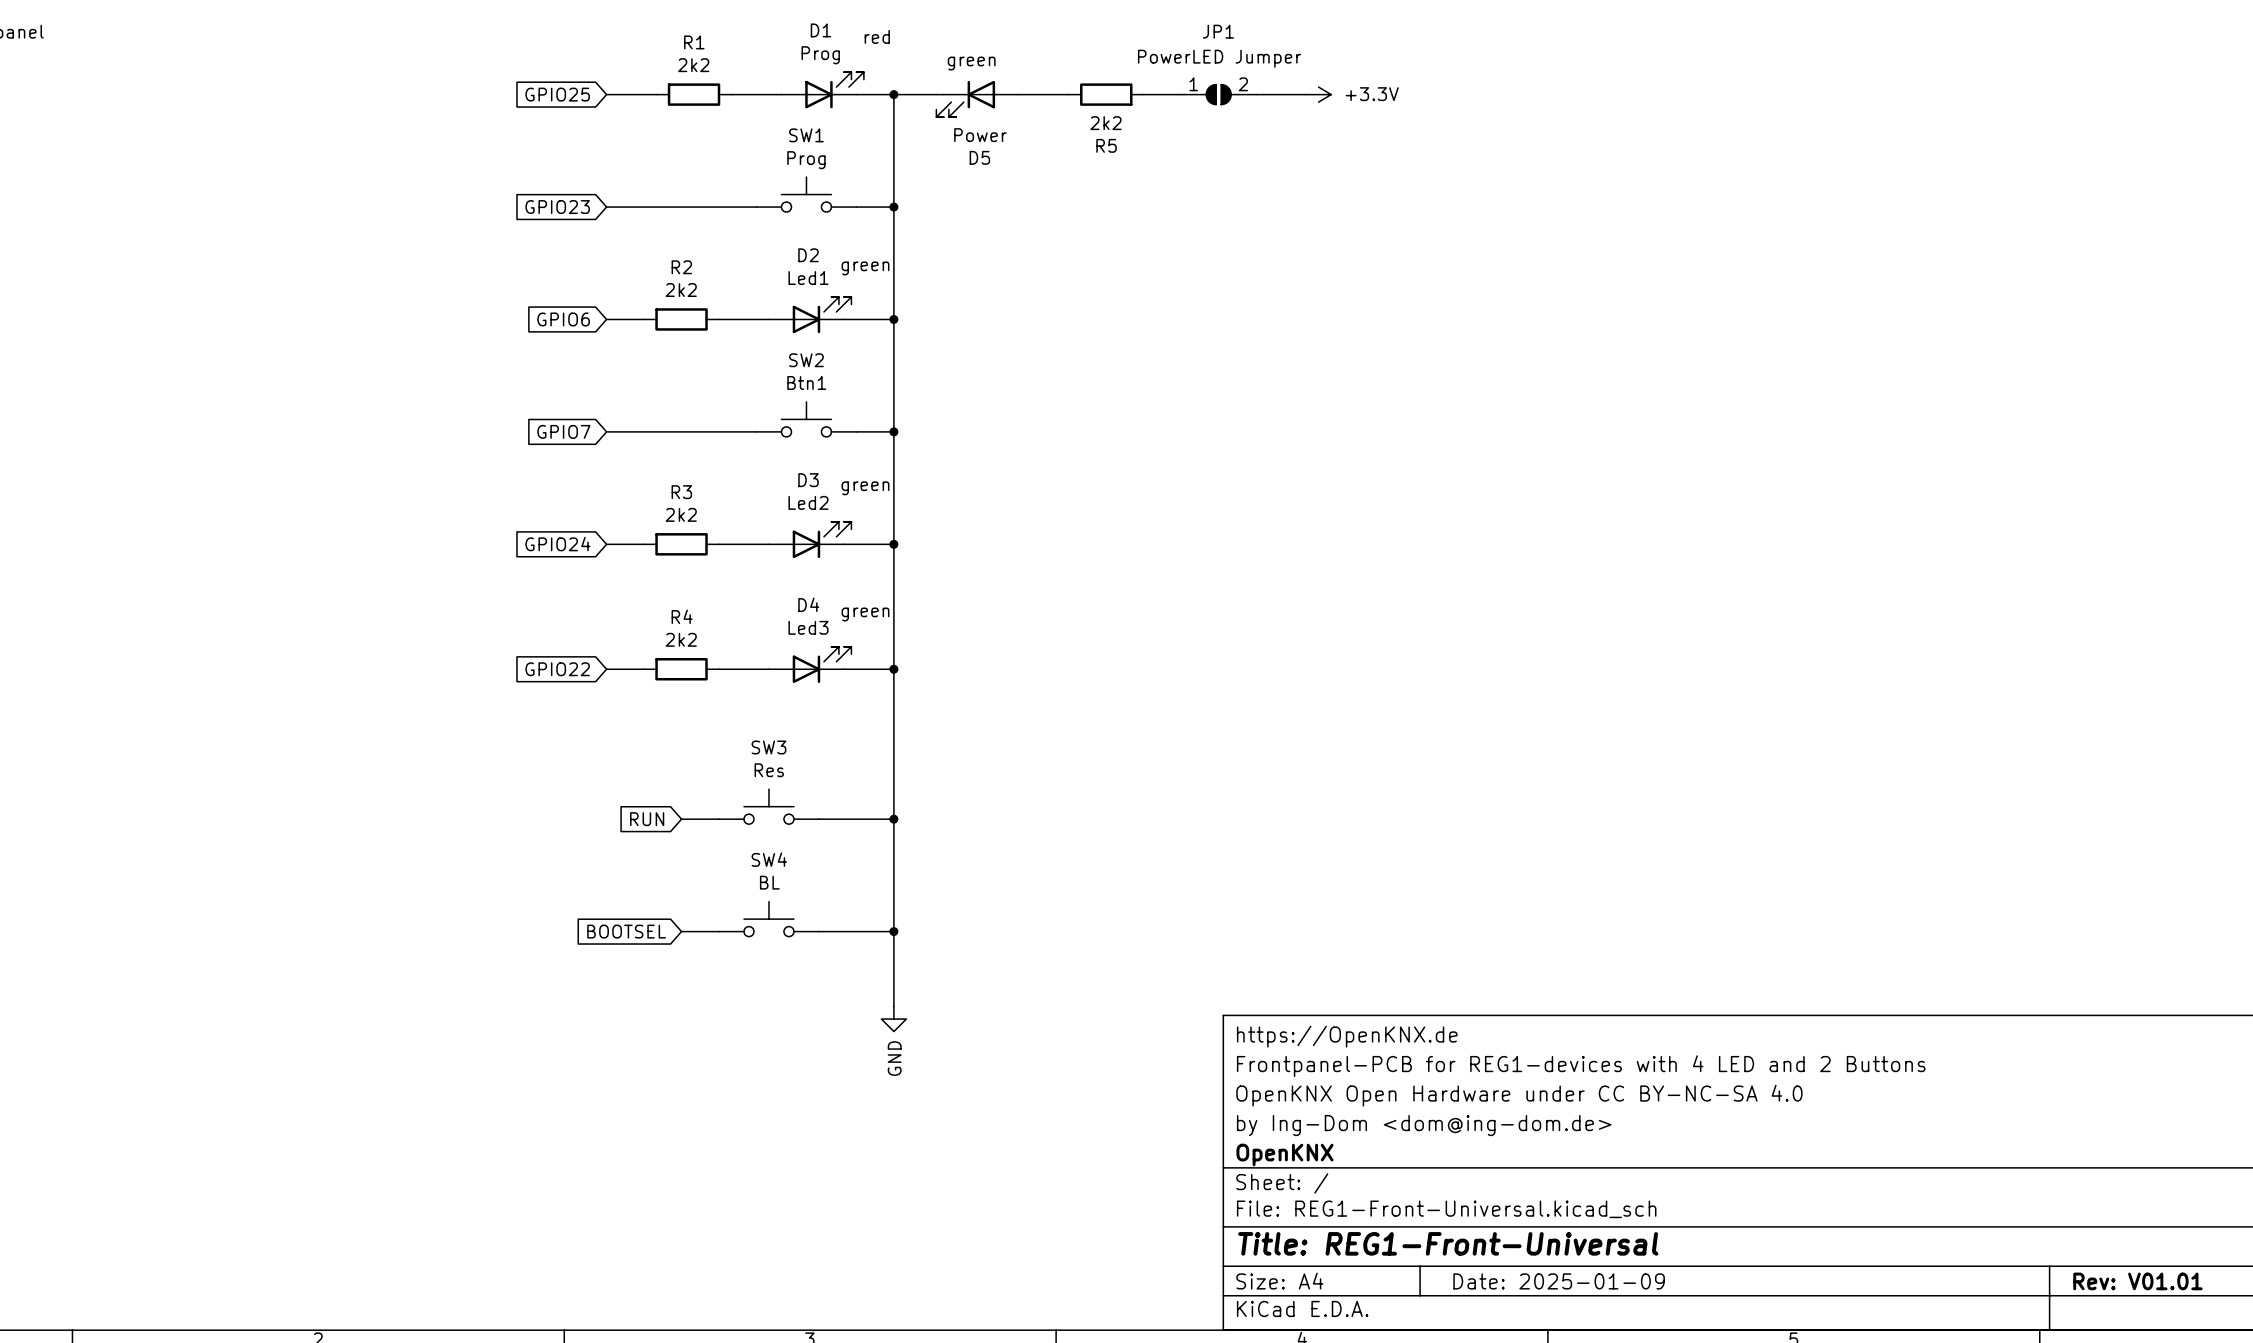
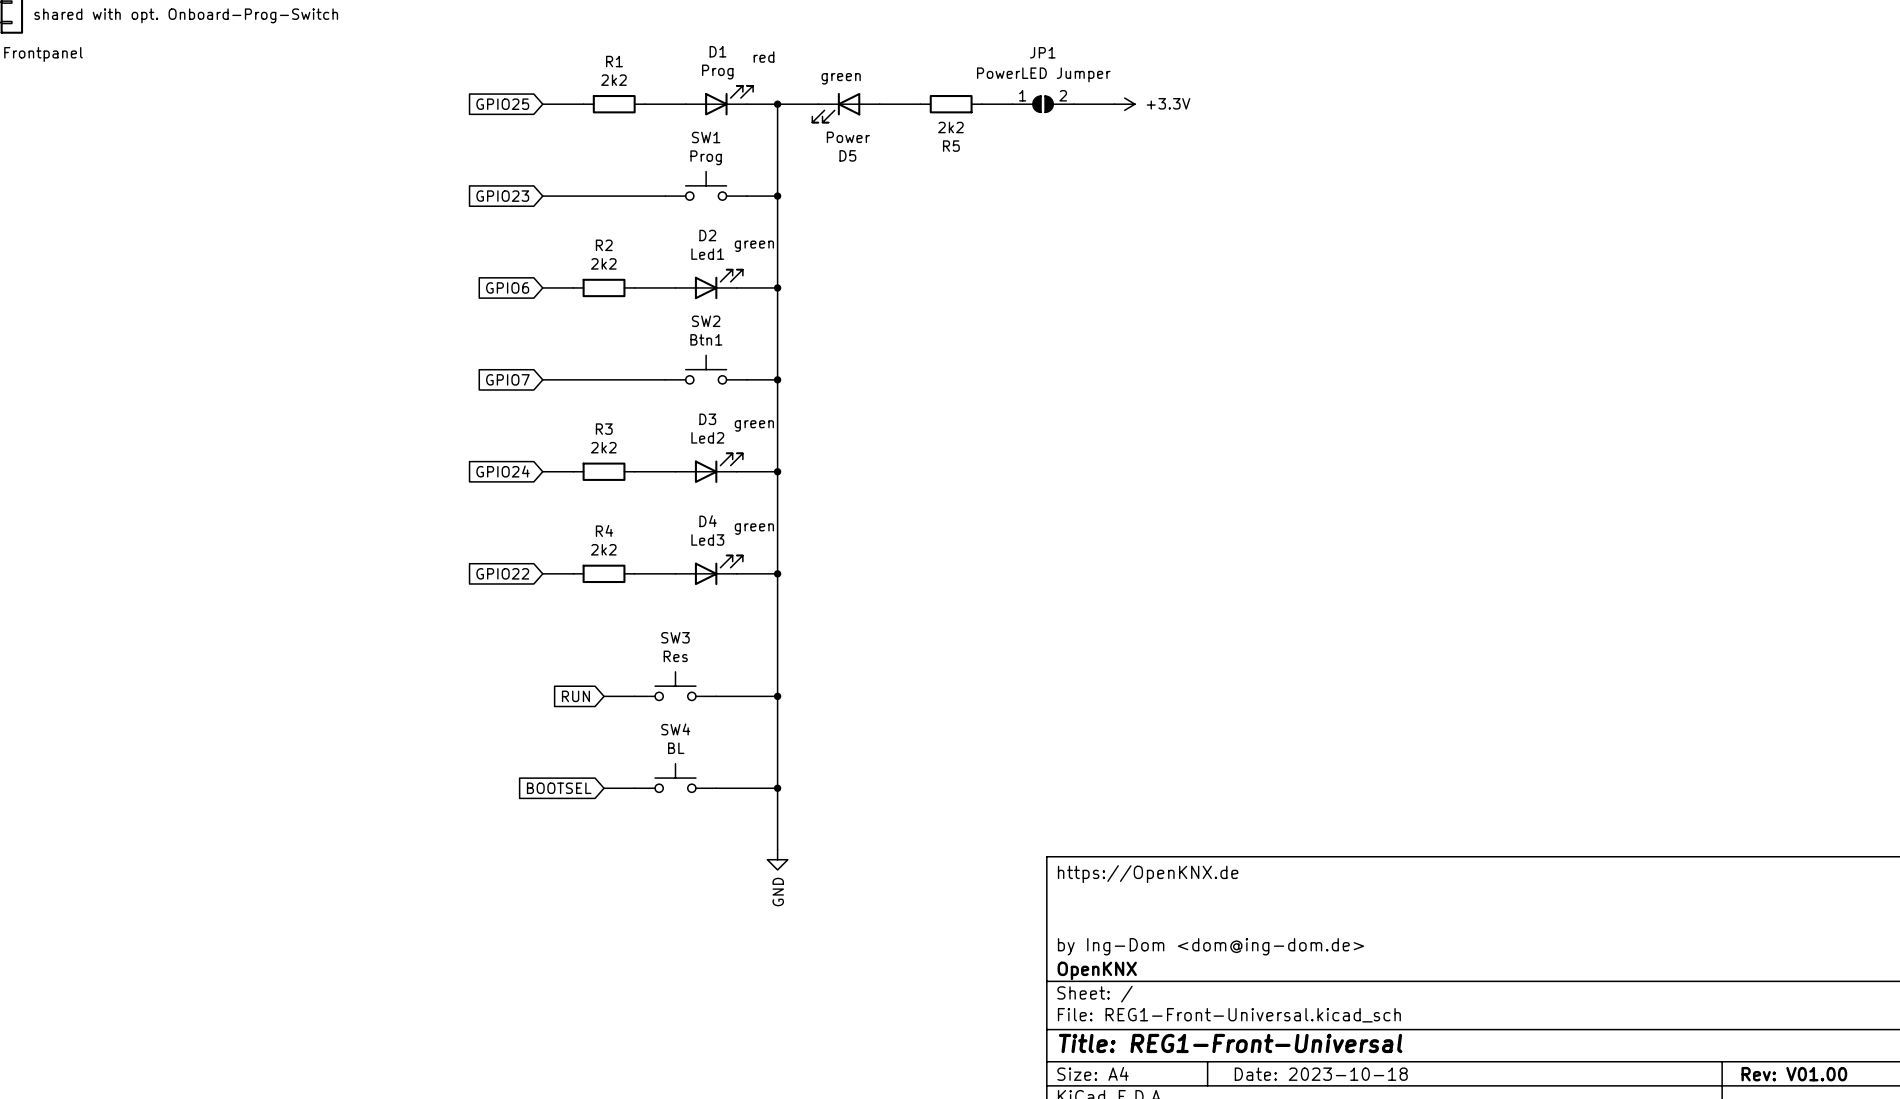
title block: Frontpanel-PCB for REG1-devices with 4 LED and 2 Buttons (1581, 1066) -> none
title block: OpenKNX Open Hardware under CC BY-NC-SA 4.0 (1519, 1095) -> none
title block: Date: 2025-01-09 (1559, 1281) -> Date: 2023-10-18 (1321, 1074)
title block: Rev: V01.01 (2137, 1281) -> Rev: V01.00 (1794, 1074)

